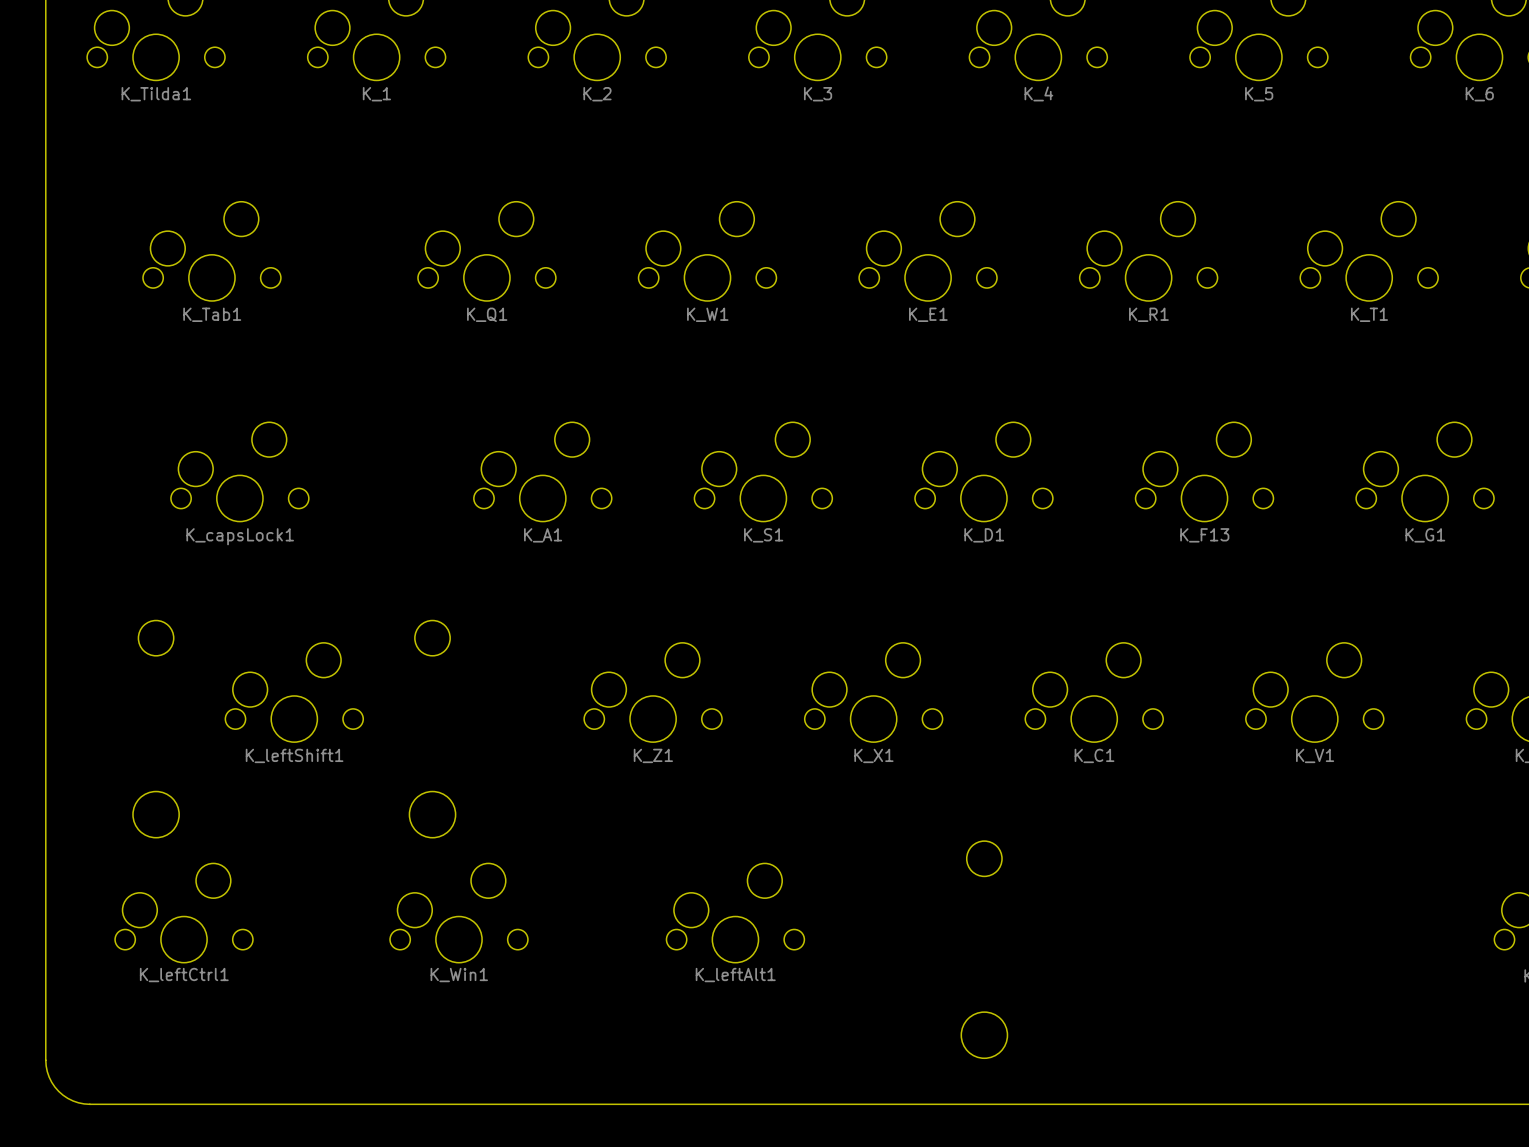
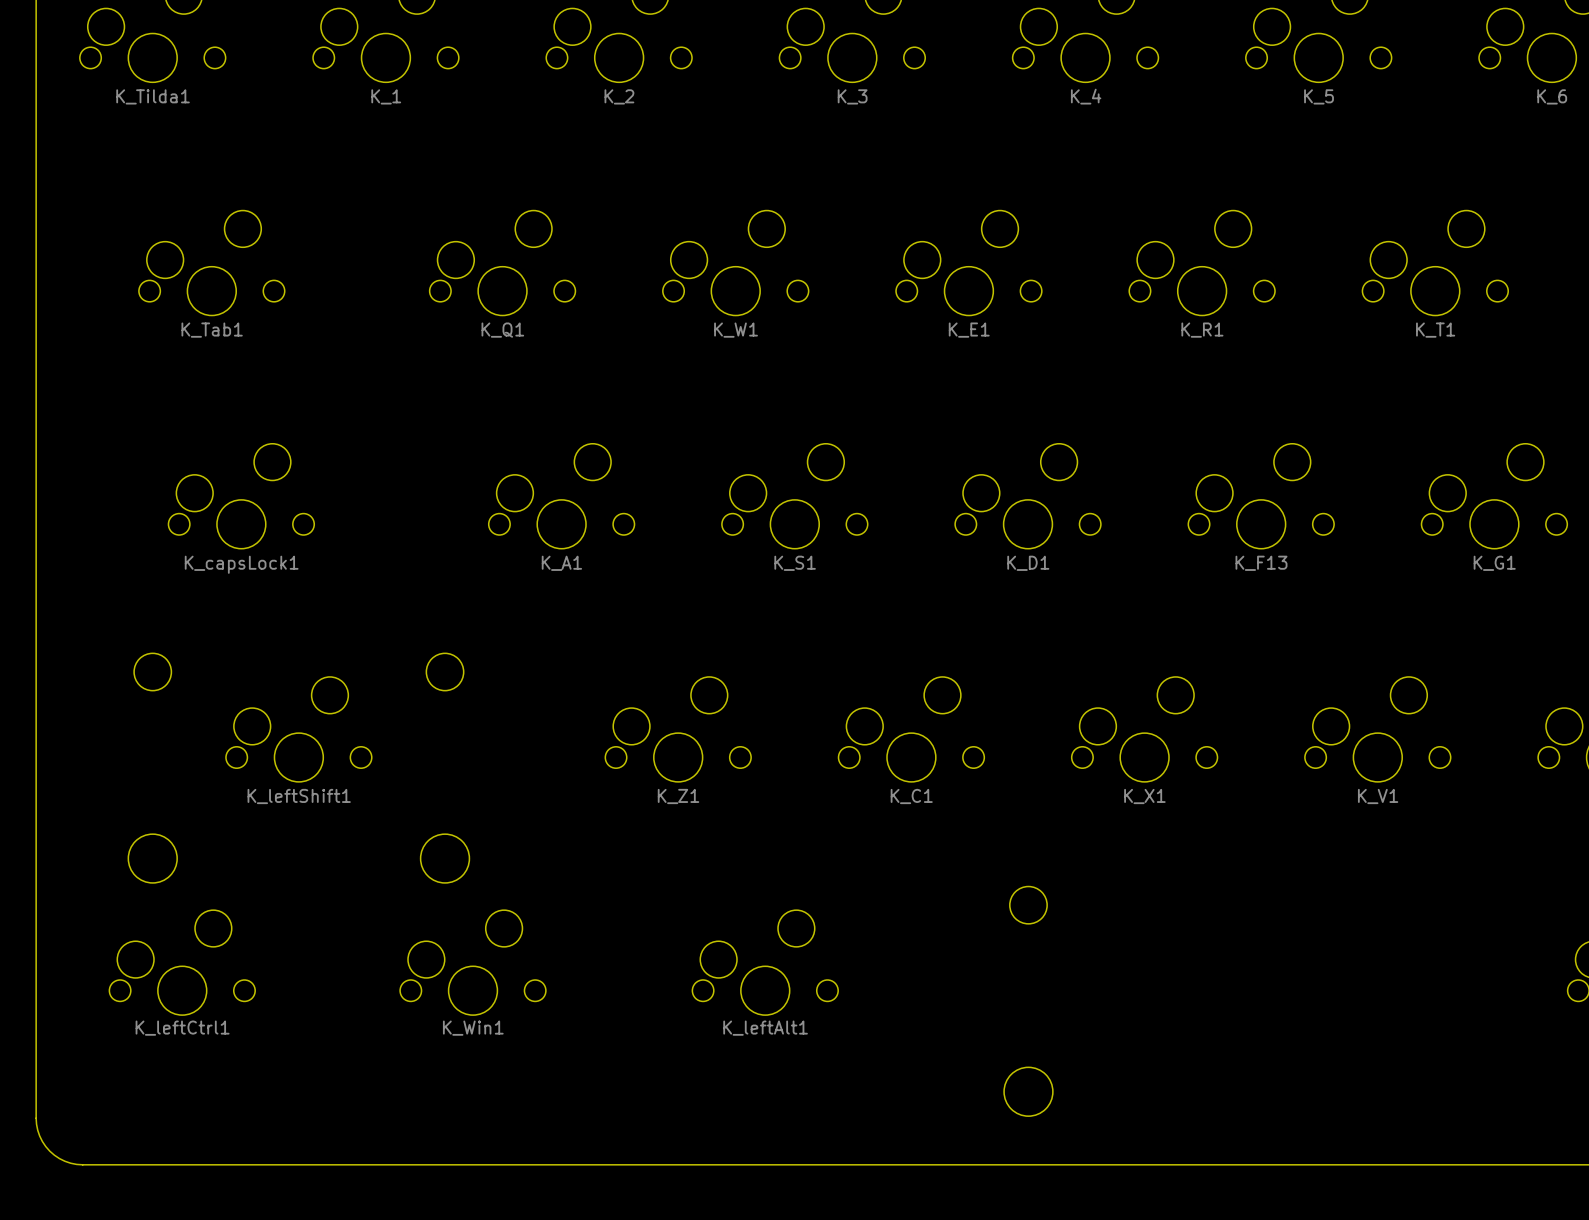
K_X1 name: K_X1 (873, 755) -> K_C1 (911, 796)
K_C1 name: K_C1 (1094, 755) -> K_X1 (1144, 796)

